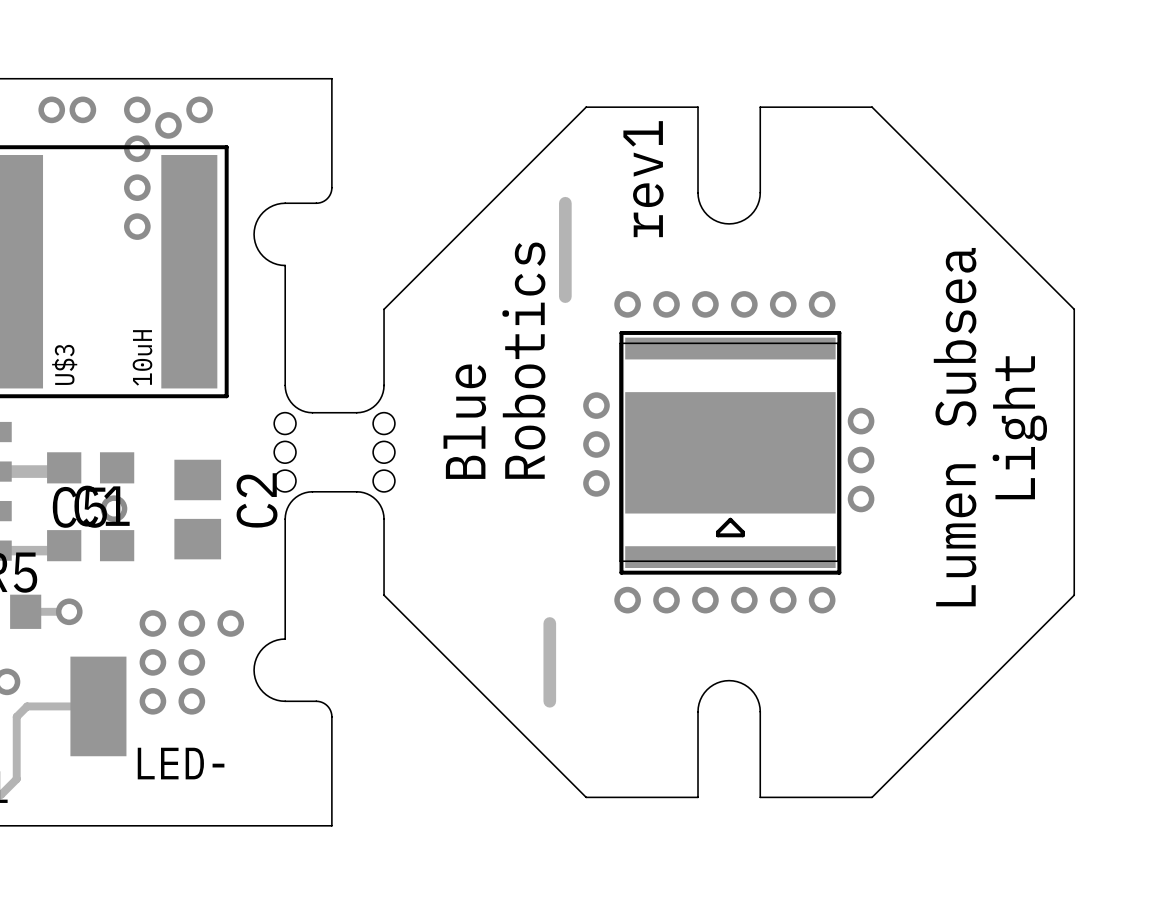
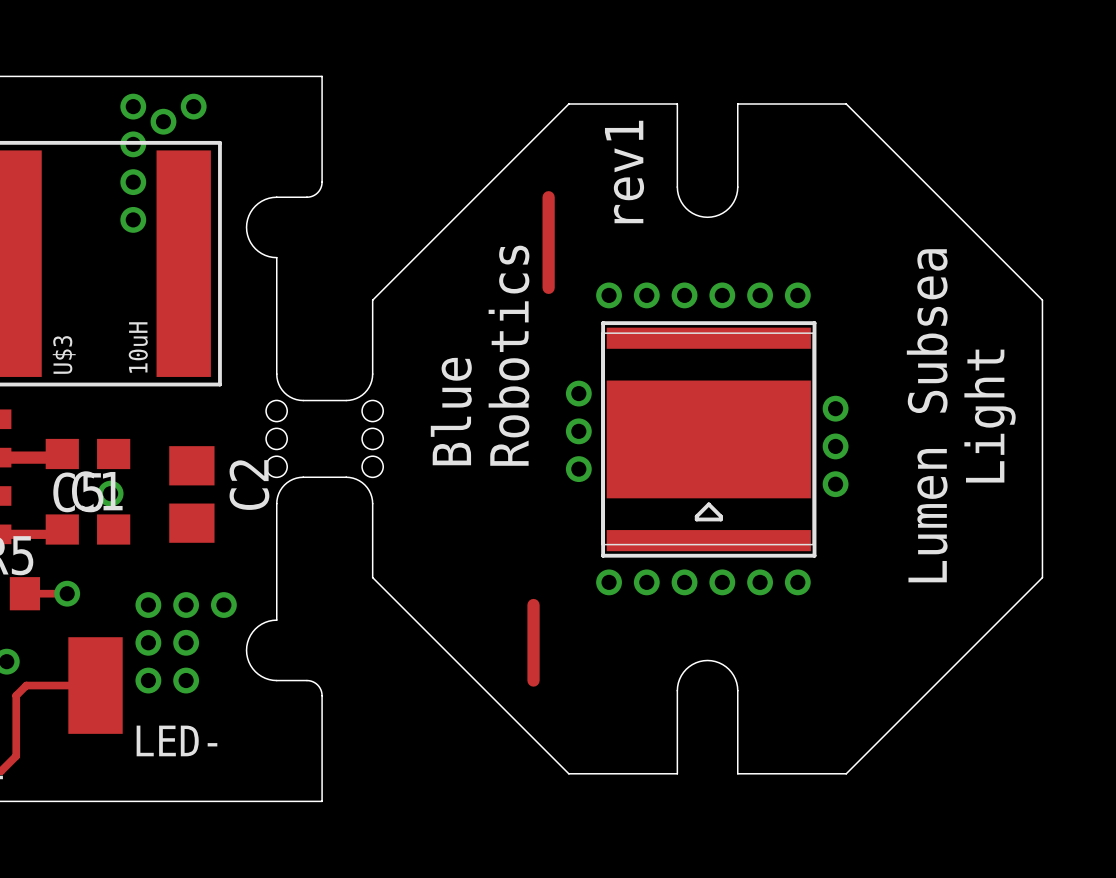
via: (51, 109) -> none
via: (82, 109) -> none

